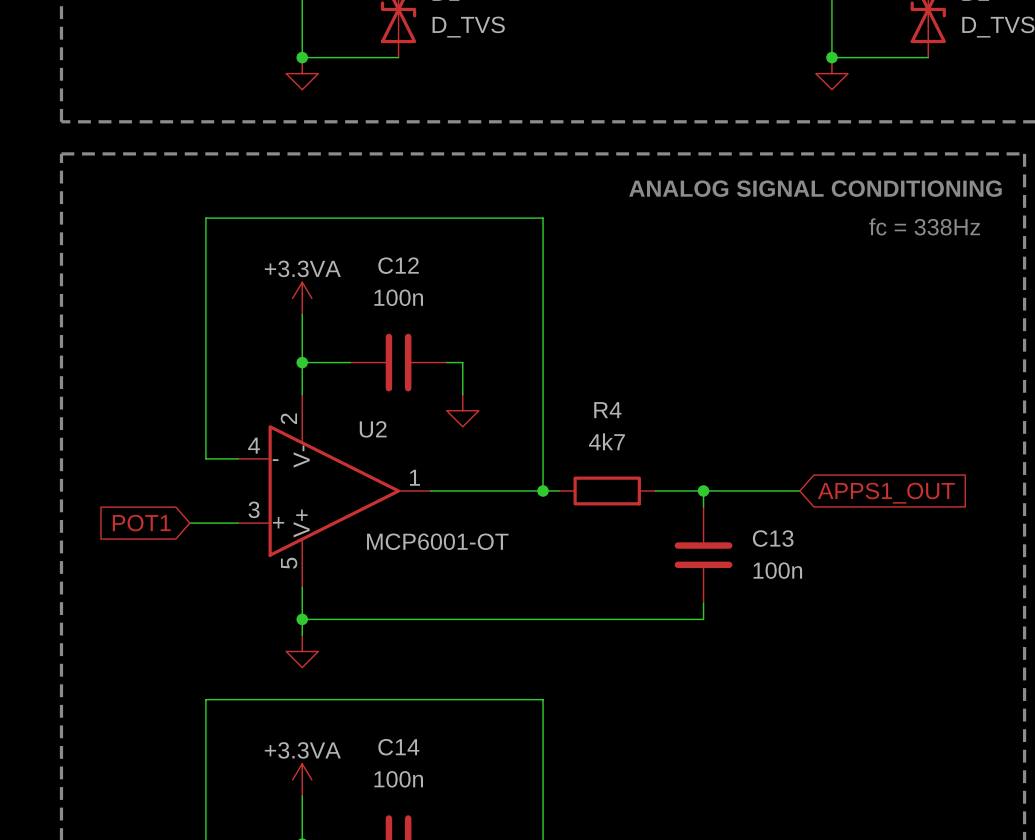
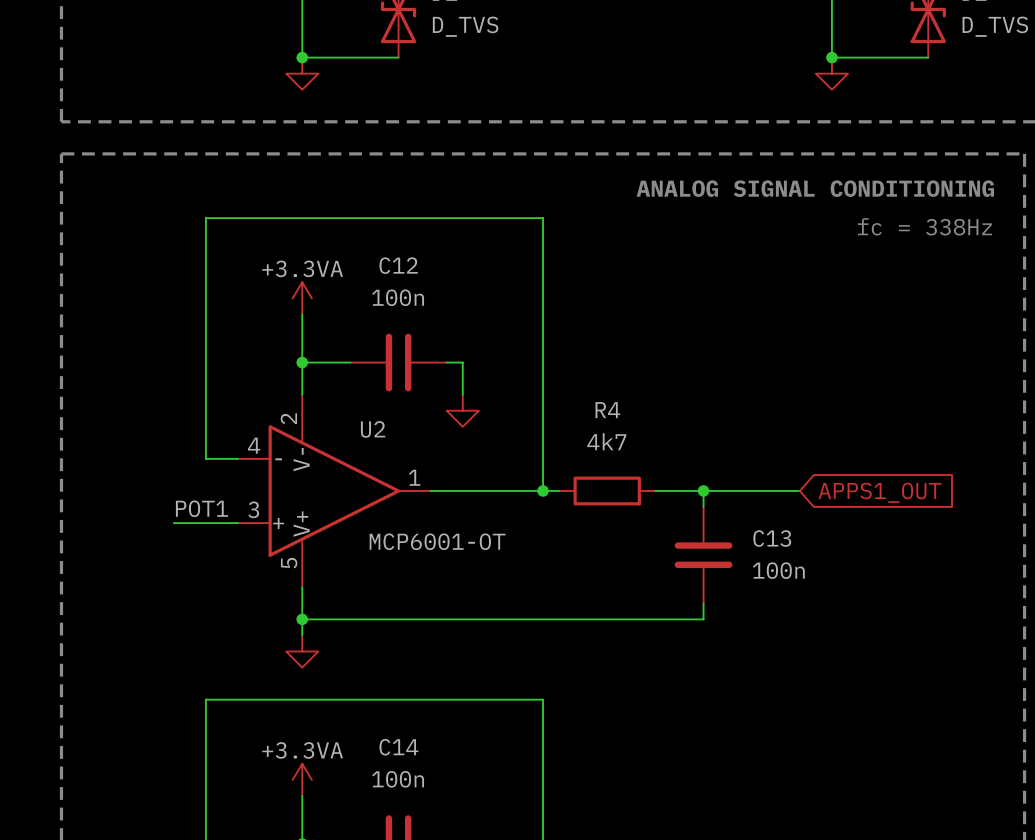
label: none -> POT1 (201, 508)
global label: POT1 (141, 523) -> none
wire: none -> (173, 523) (189, 523)

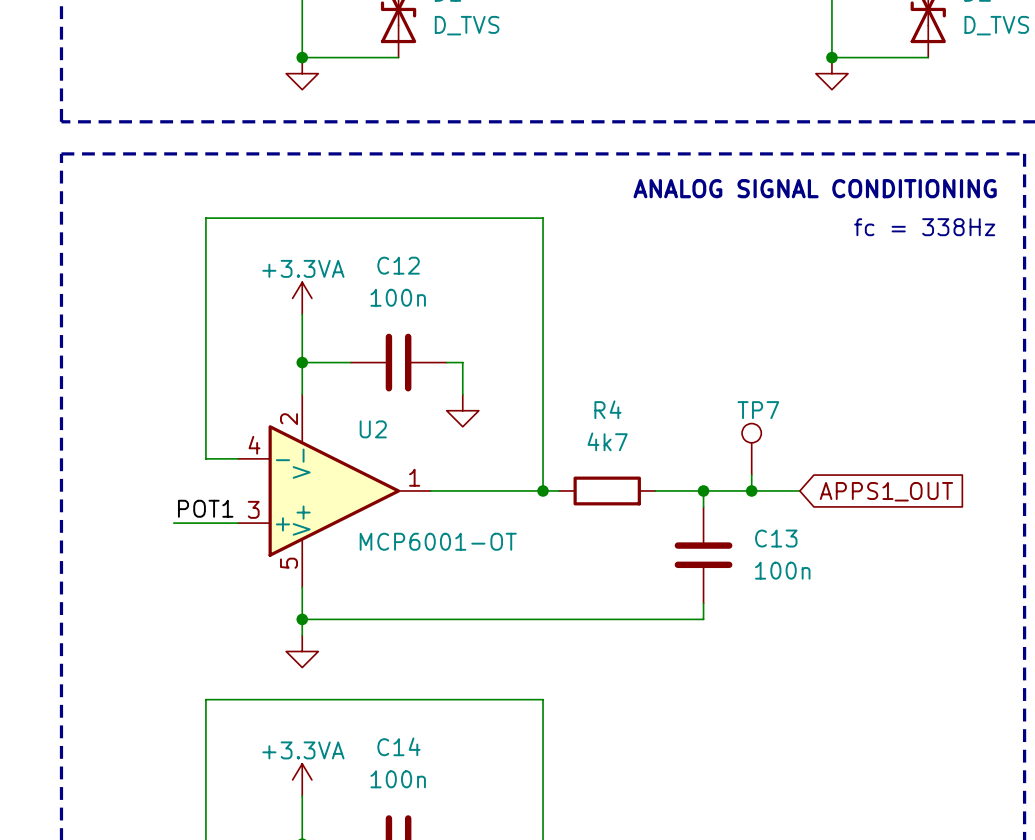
TP7: none -> (751, 449)
wire: none -> (751, 474) (751, 490)
junction: none -> (751, 490)

